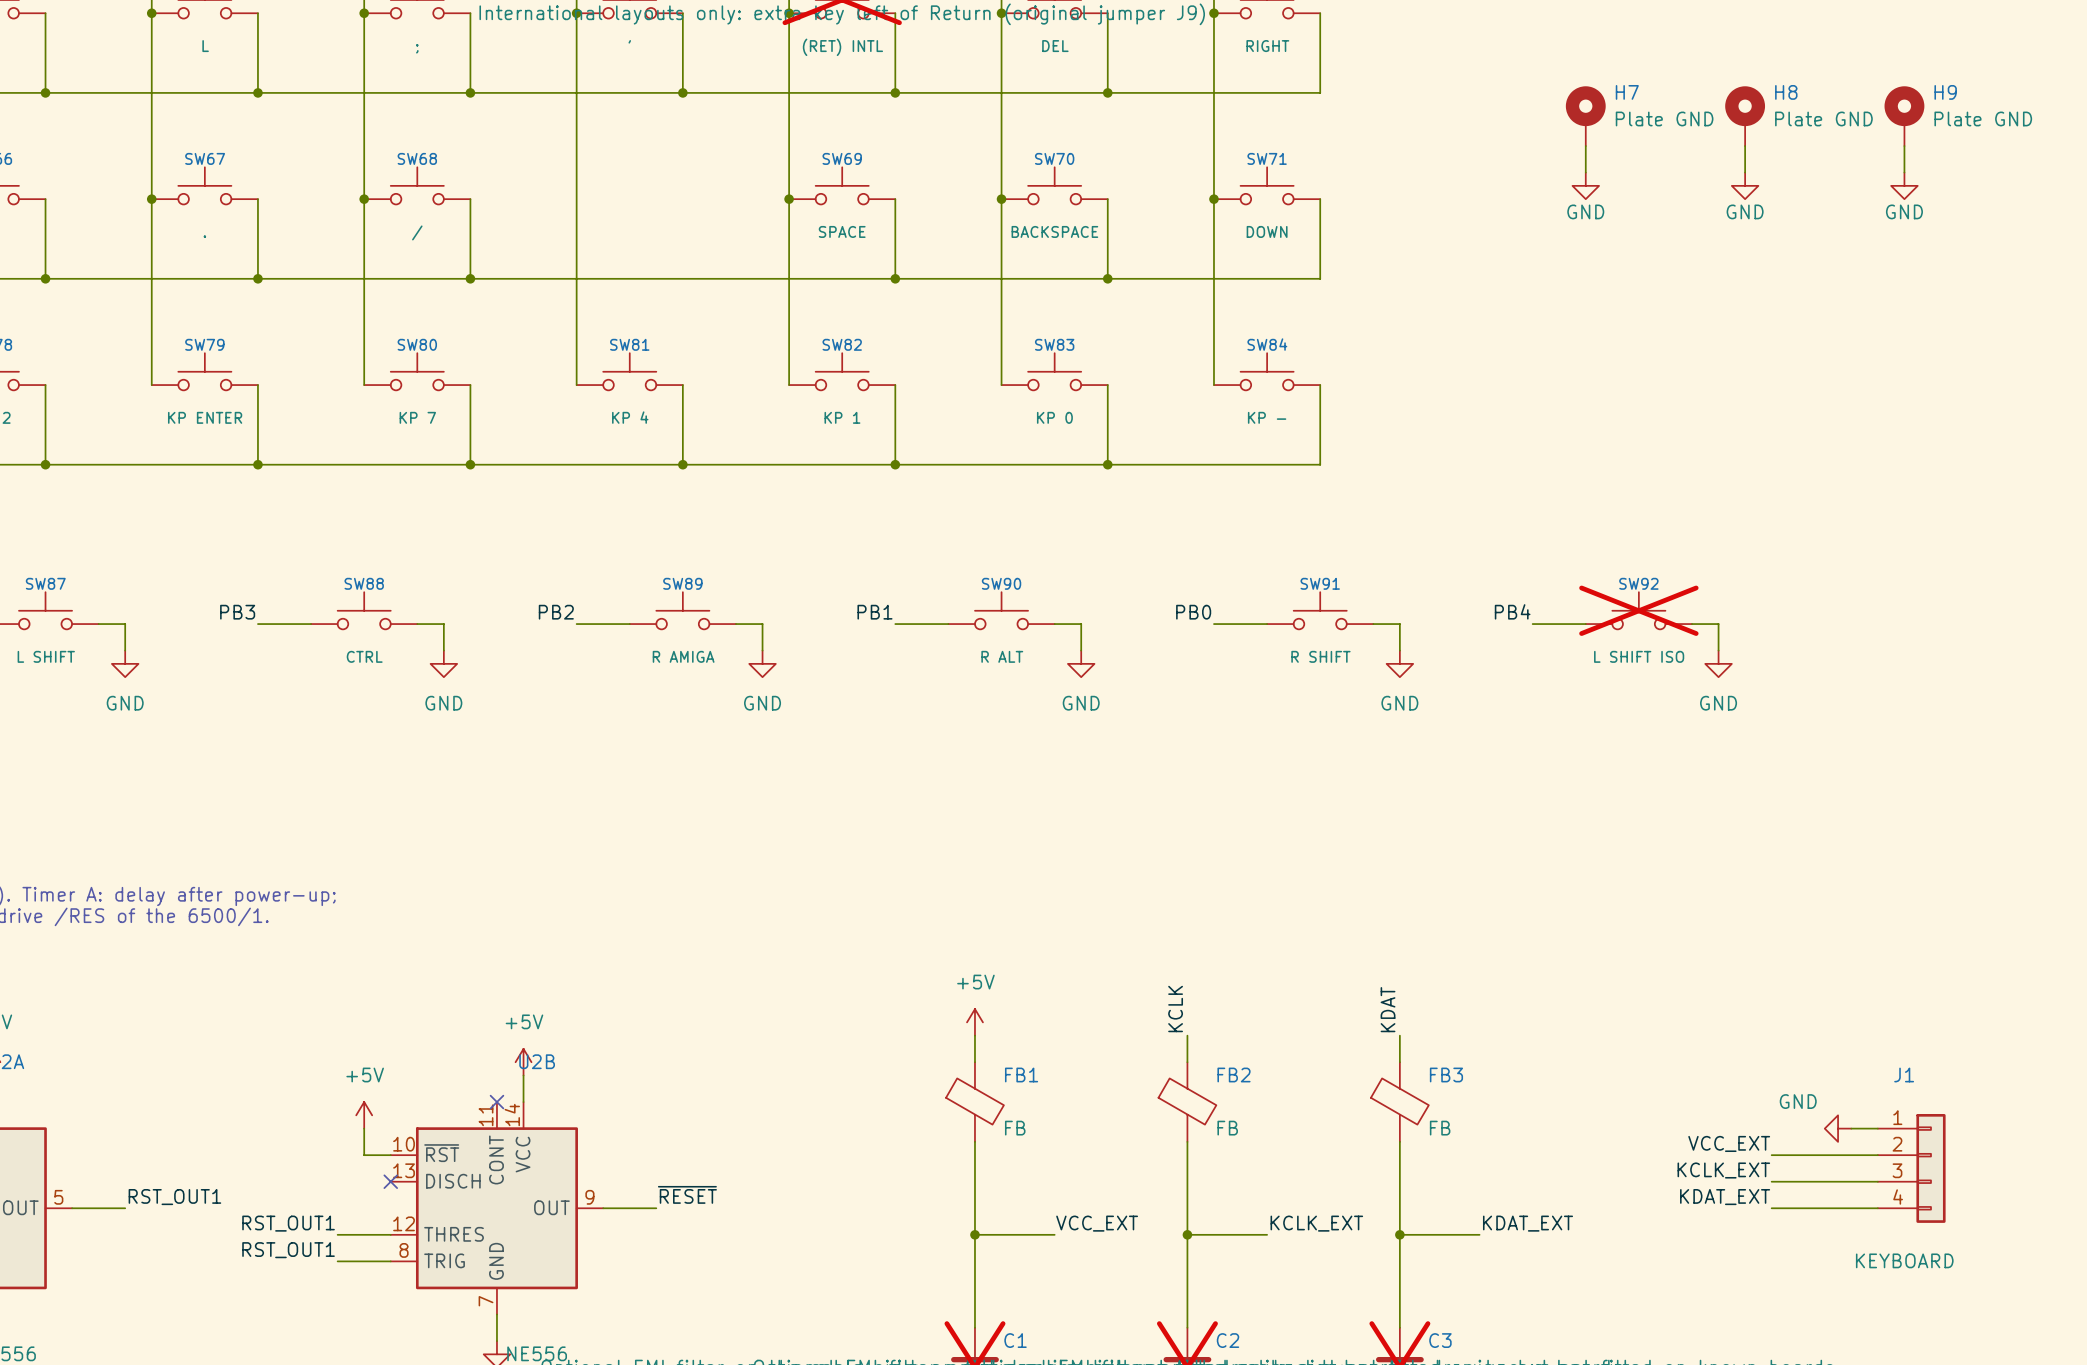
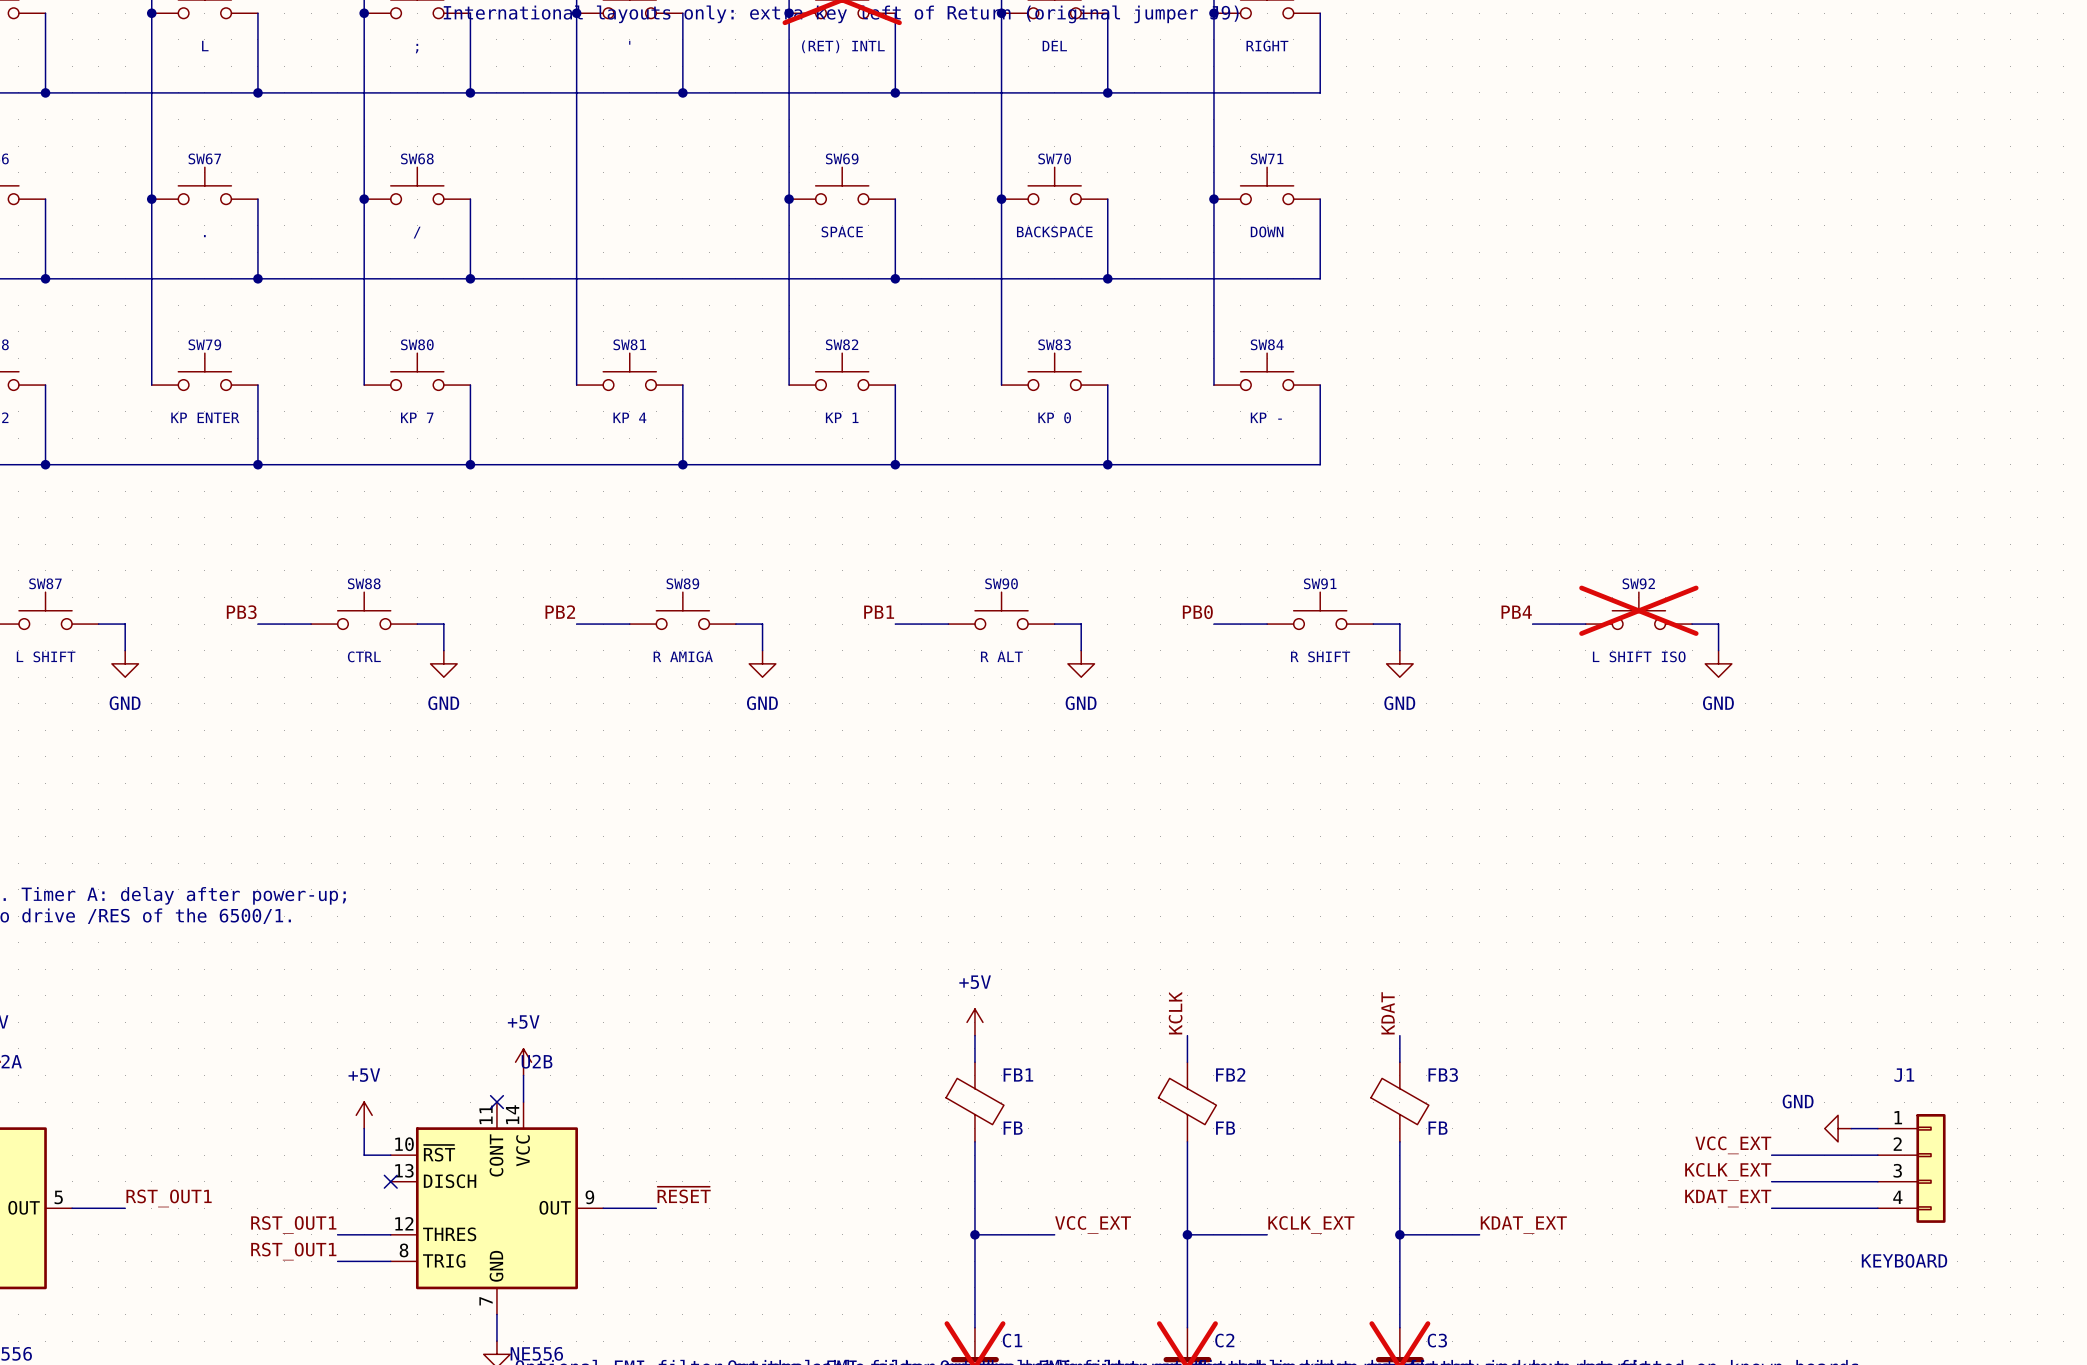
H7: Plate GND (1585, 116) -> none
H8: Plate GND (1745, 116) -> none
H9: Plate GND (1904, 116) -> none
wire: (1585, 146) (1585, 172) -> none
wire: (1745, 146) (1745, 172) -> none
wire: (1904, 146) (1904, 172) -> none
power symbol: GND (1585, 185) -> none
power symbol: GND (1745, 185) -> none
power symbol: GND (1904, 185) -> none

